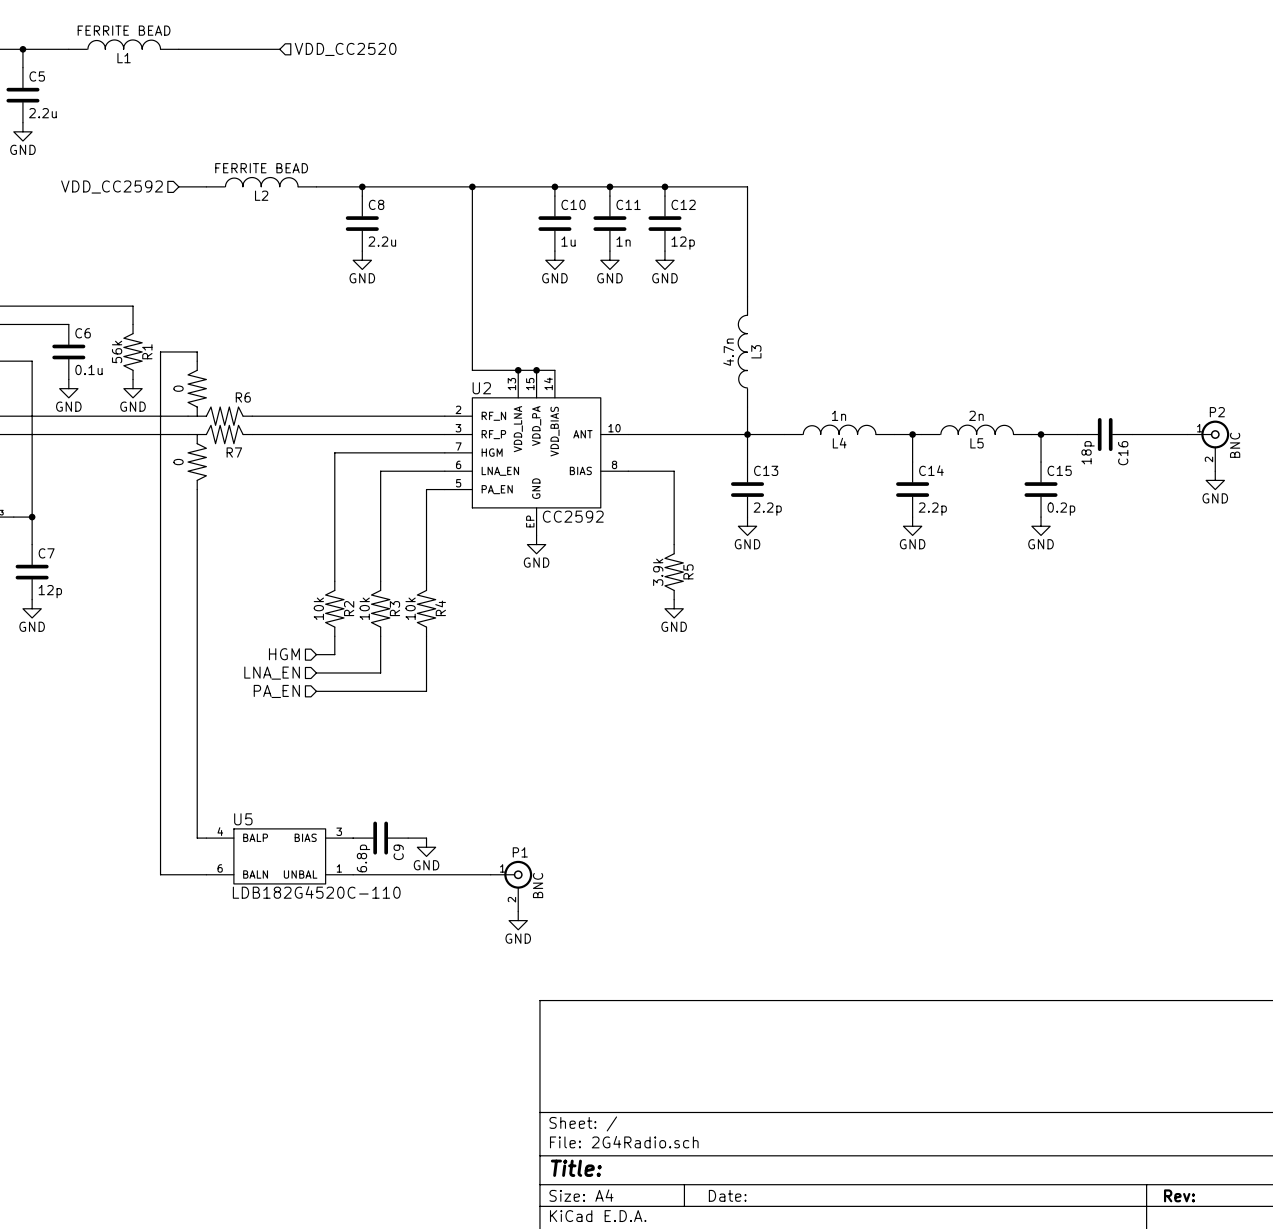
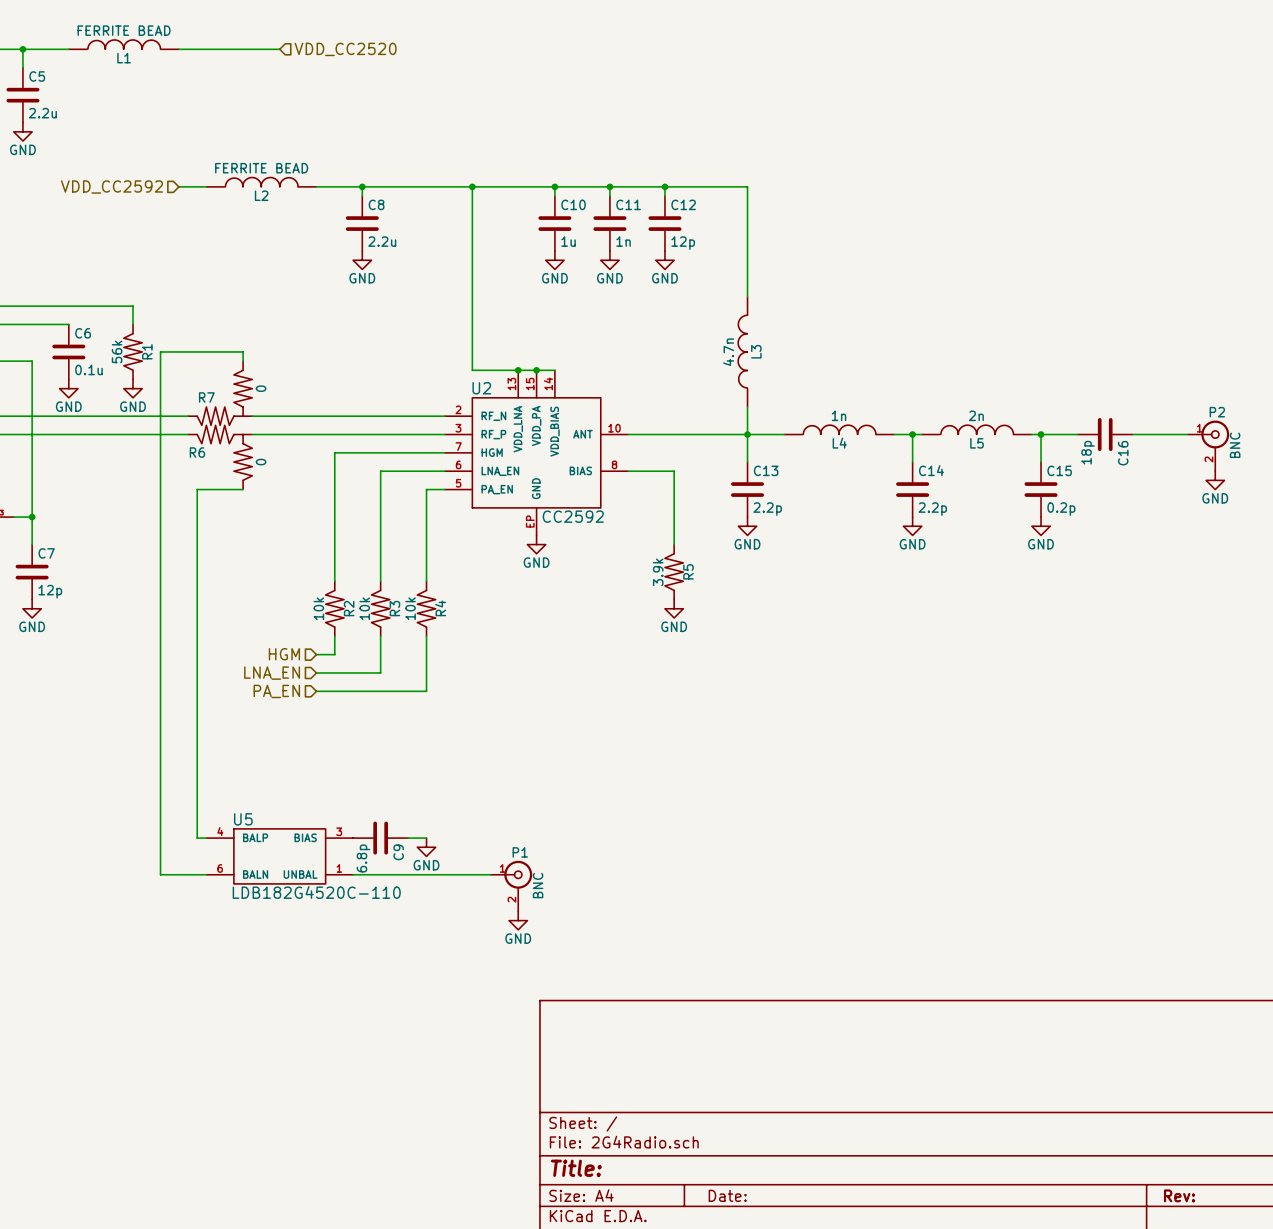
wire: (197, 351) (197, 361) -> (197, 351) (243, 351) (243, 361)
R6 position: (220, 393) -> (220, 457)
R6 rotation: 0° (215, 397) -> 180° (224, 452)
R7 rotation: 0° (215, 452) -> 180° (224, 397)
R7 position: (220, 457) -> (220, 393)
wire: none -> (197, 489) (243, 489)

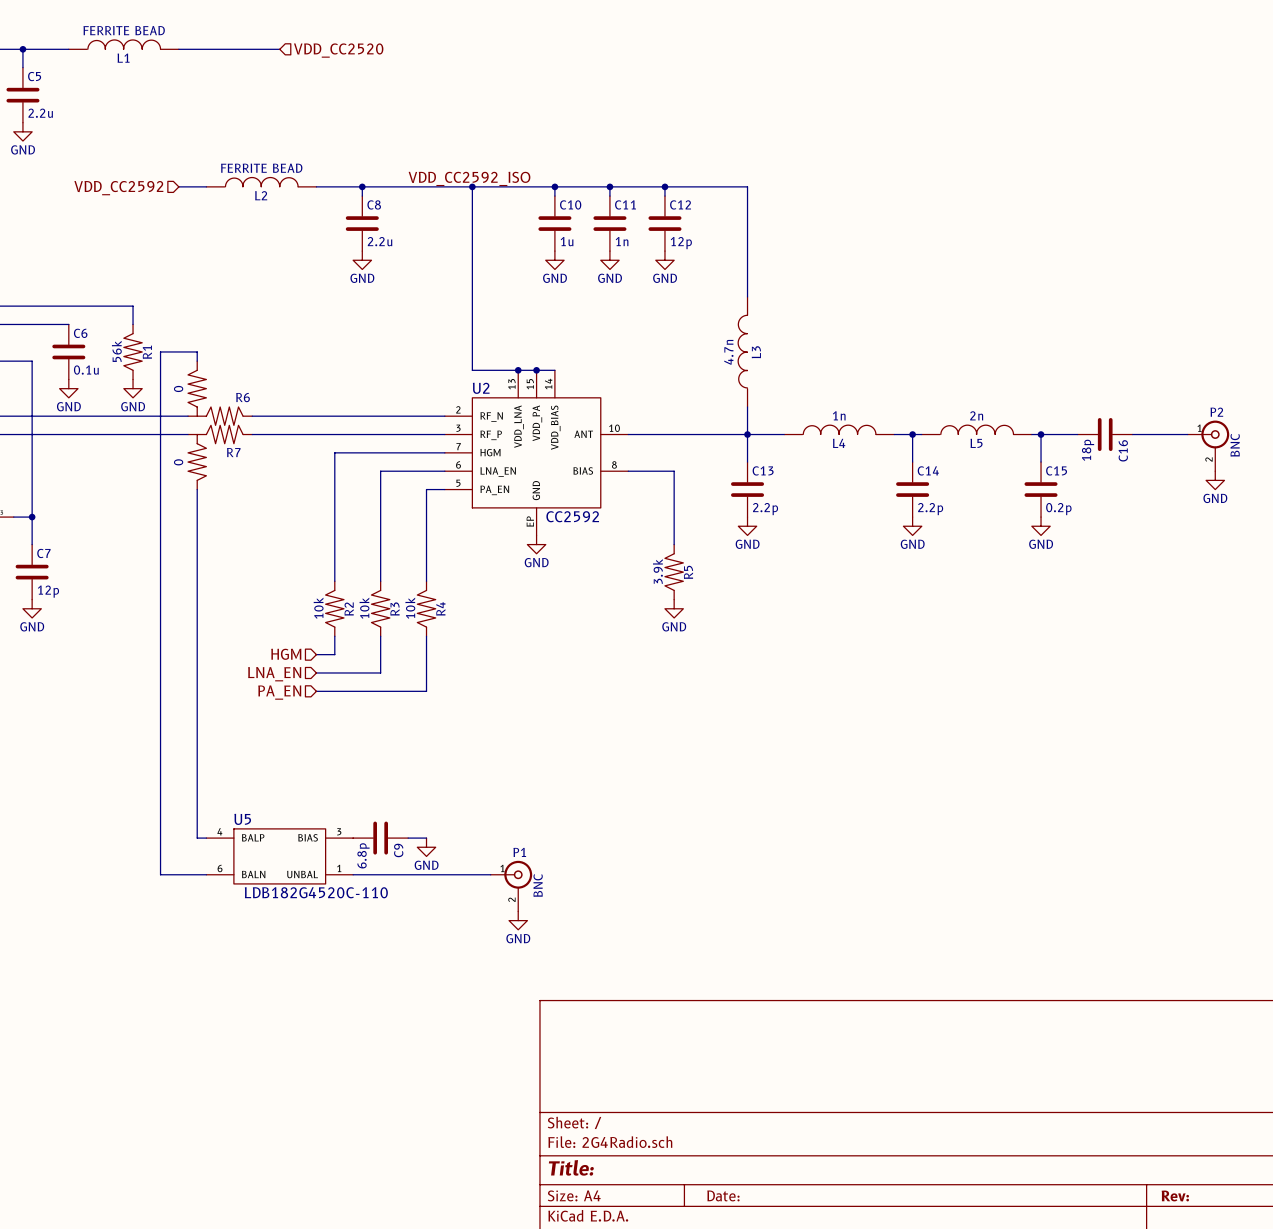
label: none -> VDD_CC2592_ISO (469, 178)
wire: (197, 351) (243, 351) (243, 361) -> (197, 351) (197, 361)
R7 position: (220, 393) -> (220, 457)
R7 rotation: 0° (224, 397) -> 180° (215, 452)
R6 rotation: 0° (224, 452) -> 180° (215, 397)
R6 position: (220, 457) -> (220, 393)
wire: (197, 489) (243, 489) -> none

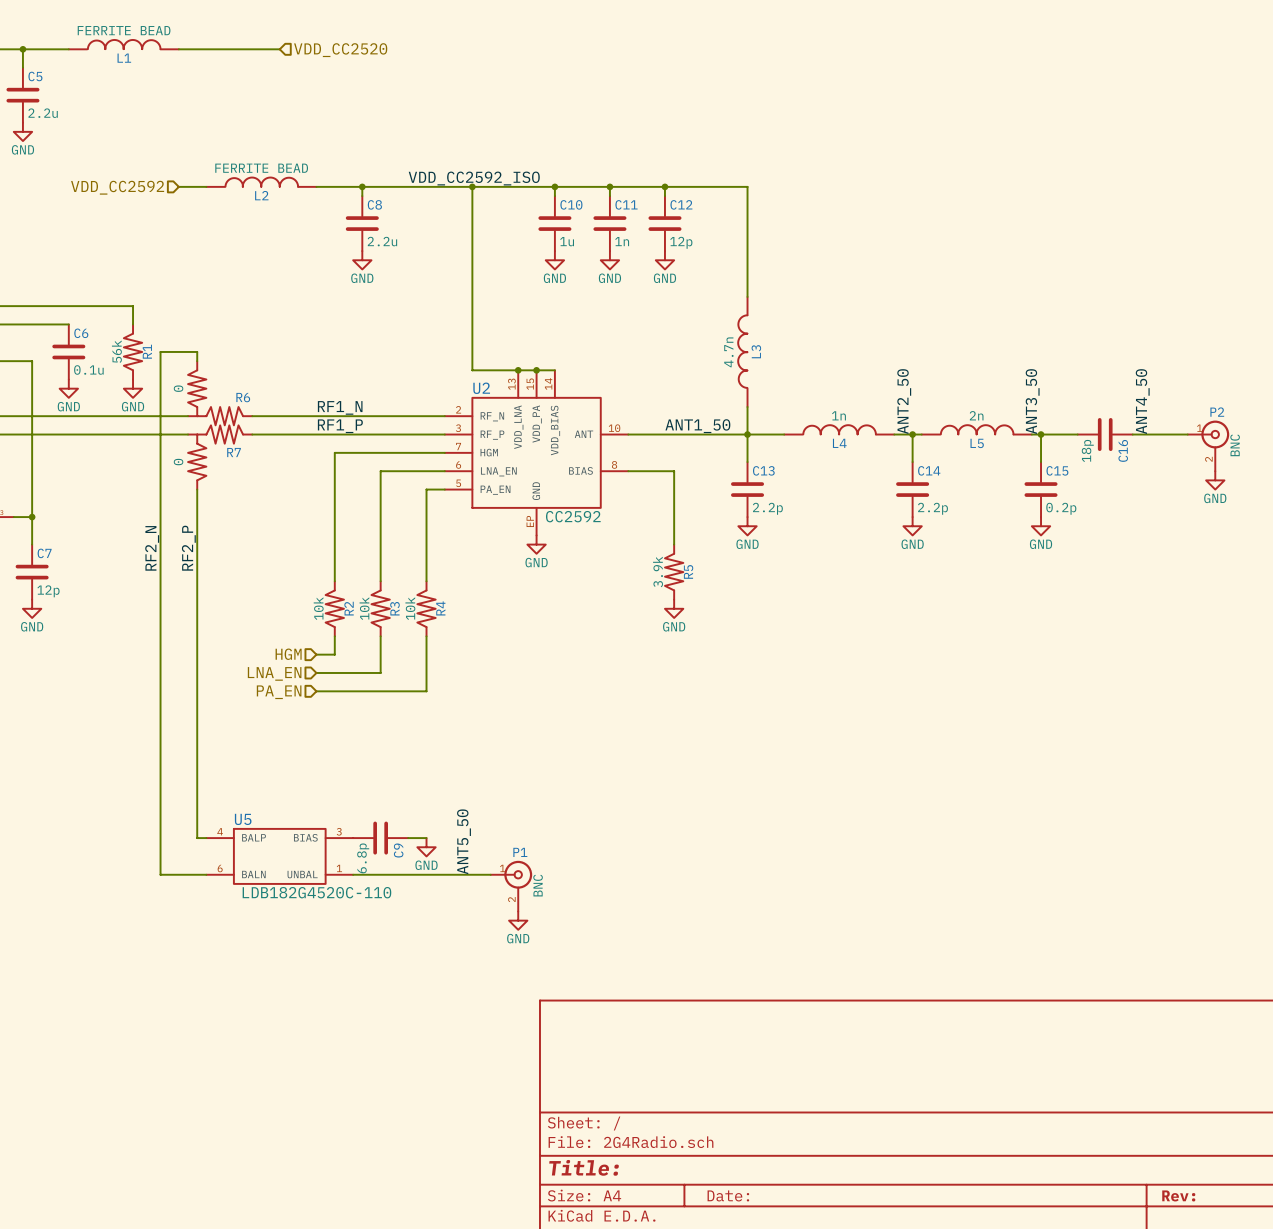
label: none -> ANT2_50 (904, 401)
label: none -> ANT3_50 (1032, 401)
label: none -> ANT4_50 (1142, 401)
label: none -> RF1_N (340, 407)
label: none -> RF1_P (340, 426)
label: none -> ANT1_50 (697, 426)
label: none -> RF2_N (152, 548)
label: none -> RF2_P (188, 548)
label: none -> ANT5_50 (464, 841)

